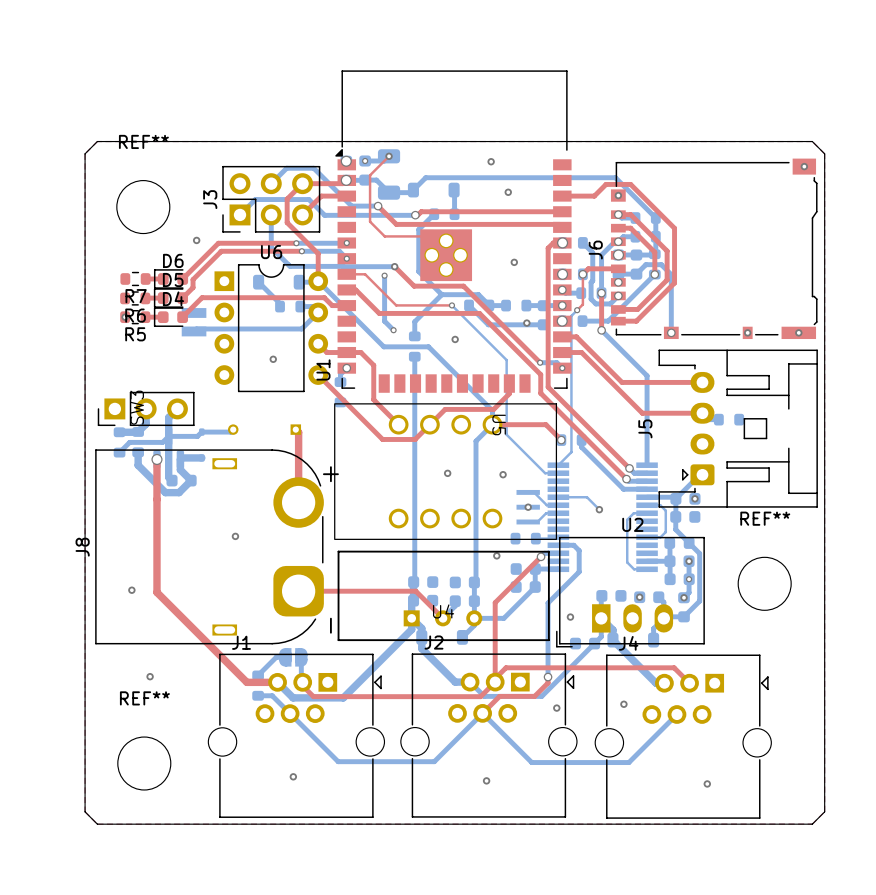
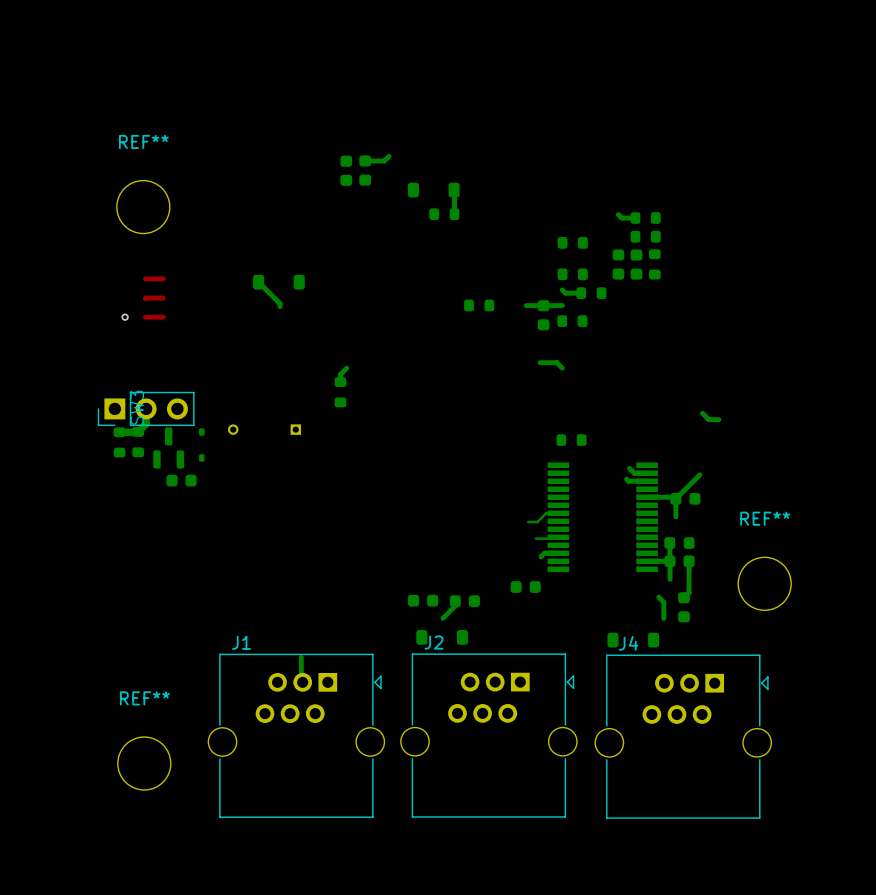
board edge: (97, 141) (812, 141) (824, 153) (824, 811) (812, 824) (97, 824) (85, 811) (85, 153) (97, 141) -> none
top track: (389, 156) (370, 175) (370, 221) (384, 236) (427, 236) -> none
via: (389, 156) -> none
via: (365, 160) -> none
via: (346, 161) -> none
via: (491, 161) -> none
via: (804, 166) -> none
part: (389, 174) -> none
bottom track: (346, 180) (376, 180) (389, 192) (410, 192) (425, 177) (615, 177) (655, 218) (655, 253) (654, 255) (618, 254) -> none
top track: (346, 180) (342, 183) (302, 183) (287, 199) (287, 222) (318, 253) (318, 281) -> none
via: (346, 180) -> none
bottom track: (271, 183) (286, 168) (313, 168) (351, 206) (378, 206) -> none
via: (508, 192) -> none
via: (618, 195) -> none
top track: (346, 196) (321, 196) (302, 214) -> none
top track: (562, 196) (594, 196) (606, 184) (630, 184) (674, 228) (674, 283) (636, 321) (618, 321) -> none
J3: (271, 199) -> none
top track: (378, 206) (396, 224) (559, 224) (562, 227) -> none
via: (378, 206) -> none
top track: (562, 211) (421, 211) (415, 215) -> none
bottom track: (240, 214) (255, 199) (308, 199) (324, 215) (415, 215) -> none
bottom track: (271, 214) (271, 247) (290, 266) (394, 266) -> none
bottom track: (434, 214) (418, 229) (418, 271) (441, 294) -> none
top track: (618, 214) (630, 214) (667, 251) (667, 279) (637, 309) (618, 309) -> none
via: (618, 214) -> none
via: (415, 215) -> none
top track: (618, 228) (630, 228) (654, 252) (654, 274) -> none
U1: (453, 231) -> none
bottom track: (635, 236) (623, 236) (618, 241) (614, 241) (601, 255) (601, 293) -> none
via: (196, 240) -> none
via: (618, 241) -> none
top track: (562, 242) (553, 242) (548, 248) (548, 387) (629, 468) -> none
via: (562, 242) -> none
bottom track: (582, 242) (592, 252) (591, 299) (595, 303) (610, 303) (618, 295) -> none
top track: (296, 243) (218, 243) (182, 278) -> none
via: (296, 243) -> none
bottom track: (346, 243) (296, 243) -> none
via: (346, 243) -> none
J6: (714, 248) -> none
bottom track: (301, 251) (339, 251) (346, 258) -> none
top track: (301, 251) (221, 251) (193, 279) (193, 287) (182, 298) -> none
via: (301, 251) -> none
via: (618, 254) -> none
via: (346, 258) -> none
via: (514, 262) -> none
top track: (394, 266) (414, 286) (463, 286) (540, 362) -> none
via: (394, 266) -> none
top track: (618, 268) (588, 268) (582, 274) (582, 304) (577, 310) -> none
top track: (346, 274) (365, 274) (396, 305) (451, 305) -> none
via: (562, 274) -> none
via: (582, 274) -> none
bottom track: (618, 274) (636, 274) (645, 264) (661, 264) (671, 274) (671, 332) -> none
bottom track: (654, 274) (608, 321) (582, 321) -> none
via: (654, 274) -> none
bottom track: (384, 275) (384, 321) (393, 330) -> none
via: (384, 275) -> none
R7: (135, 278) -> none
D6: (171, 278) -> none
bottom track: (299, 282) (318, 281) (383, 346) (428, 346) (492, 410) (492, 424) (476, 441) (474, 618) -> none
via: (618, 282) -> none
top track: (346, 289) (355, 289) (379, 313) (479, 313) (540, 374) (540, 393) (626, 479) -> none
via: (562, 289) -> none
top track: (601, 293) (601, 330) -> none
via: (601, 293) -> none
bottom track: (441, 294) (414, 321) (414, 336) -> none
bottom track: (441, 294) (478, 294) (489, 305) (506, 305) -> none
via: (618, 295) -> none
R6: (135, 298) -> none
D5: (170, 298) -> none
top track: (346, 305) (332, 305) (324, 297) (202, 297) (182, 317) -> none
bottom track: (451, 305) (506, 360) (506, 434) (545, 473) (558, 473) -> none
via: (451, 305) -> none
bottom track: (469, 305) (488, 324) (543, 324) -> none
part: (516, 305) -> none
via: (562, 305) -> none
part: (290, 306) -> none
bottom track: (300, 306) (312, 306) (318, 312) (301, 328) (196, 328) (194, 331) -> none
bottom track: (577, 310) (571, 315) (571, 452) (558, 465) -> none
via: (577, 310) -> none
R5: (135, 317) -> none
D4: (170, 317) -> none
via: (562, 321) -> none
part: (194, 322) -> none
via: (526, 323) -> none
U6: (271, 328) -> none
via: (393, 330) -> none
bottom track: (601, 330) (647, 375) (647, 465) -> none
via: (601, 330) -> none
via: (671, 332) -> none
via: (747, 332) -> none
via: (798, 332) -> none
top track: (562, 336) (576, 336) (622, 382) (702, 382) -> none
via: (455, 339) -> none
top track: (318, 343) (326, 352) (360, 352) (373, 365) (373, 399) (398, 424) -> none
part: (414, 346) -> none
top track: (562, 352) (581, 352) (642, 413) (702, 413) -> none
bottom track: (414, 356) (413, 582) -> none
via: (273, 359) -> none
via: (540, 362) -> none
via: (346, 368) -> none
via: (562, 368) -> none
top track: (318, 375) (382, 439) (415, 439) (445, 409) (493, 409) (509, 393) (509, 383) -> none
bottom track: (177, 408) (168, 417) (168, 477) (172, 480) -> none
part: (729, 419) -> none
top track: (492, 424) (545, 424) (561, 440) -> none
J5: (738, 428) -> none
bottom track: (233, 429) (230, 432) (201, 432) (197, 436) (168, 436) (162, 442) (129, 442) (119, 452) -> none
top track: (295, 429) (298, 432) (298, 502) -> none
via: (561, 440) -> none
bottom track: (581, 440) (581, 447) (623, 489) (647, 489) -> none
bottom track: (138, 452) (138, 465) (165, 492) (179, 492) (191, 480) (180, 469) (181, 457) (201, 457) -> none
top track: (156, 459) (156, 592) (246, 682) (277, 682) -> none
via: (156, 459) -> none
via: (629, 468) -> none
U5: (445, 471) -> none
via: (447, 473) -> none
via: (503, 474) -> none
via: (626, 479) -> none
bottom track: (528, 492) (534, 492) (546, 505) (558, 505) -> none
bottom track: (558, 497) (586, 497) (599, 509) -> none
via: (694, 498) -> none
bottom track: (647, 505) (660, 505) (665, 510) (665, 532) (660, 537) (647, 537) -> none
part: (528, 507) -> none
via: (528, 507) -> none
via: (599, 509) -> none
bottom track: (647, 513) (633, 513) (627, 519) (627, 562) (634, 569) (647, 569) -> none
bottom track: (675, 516) (675, 529) (699, 553) (699, 601) (684, 616) (665, 616) (653, 628) (653, 640) -> none
part: (685, 516) -> none
via: (235, 536) -> none
part: (525, 538) -> none
bottom track: (558, 545) (573, 545) (579, 550) (579, 571) (548, 603) (548, 677) -> none
J8: (209, 546) -> none
via: (496, 555) -> none
top track: (541, 556) (495, 602) (495, 685) -> none
via: (541, 556) -> none
via: (689, 561) -> none
part: (525, 569) -> none
bottom track: (558, 569) (535, 569) (535, 587) (503, 618) (474, 618) (474, 625) (462, 637) -> none
part: (679, 579) -> none
via: (689, 579) -> none
bottom track: (413, 582) (411, 629) (343, 697) (293, 697) (277, 682) -> none
part: (423, 582) -> none
part: (464, 582) -> none
via: (131, 590) -> none
top track: (298, 591) (415, 591) (442, 618) -> none
U2: (630, 592) -> none
U4: (443, 595) -> none
bottom track: (601, 595) (601, 636) (541, 696) (484, 696) (470, 682) (455, 682) (421, 648) (421, 628) (411, 618) -> none
part: (611, 595) -> none
via: (639, 597) -> none
part: (649, 597) -> none
via: (684, 597) -> none
via: (570, 617) -> none
bottom track: (601, 617) (612, 630) (612, 640) (656, 683) (664, 683) -> none
part: (585, 643) -> none
bottom track: (285, 657) (276, 657) (258, 675) -> none
part: (293, 657) -> none
via: (150, 676) -> none
top track: (548, 677) (548, 682) (534, 696) (499, 696) (482, 713) -> none
via: (548, 677) -> none
top track: (495, 678) (506, 667) (674, 667) (689, 683) -> none
top track: (495, 682) (480, 696) (313, 696) (302, 685) (302, 682) -> none
part: (258, 685) -> none
bottom track: (258, 695) (272, 695) (338, 761) (434, 761) (482, 713) (531, 762) (628, 762) (676, 714) -> none
via: (623, 704) -> none
via: (556, 708) -> none
via: (293, 776) -> none
via: (486, 780) -> none
via: (707, 783) -> none

